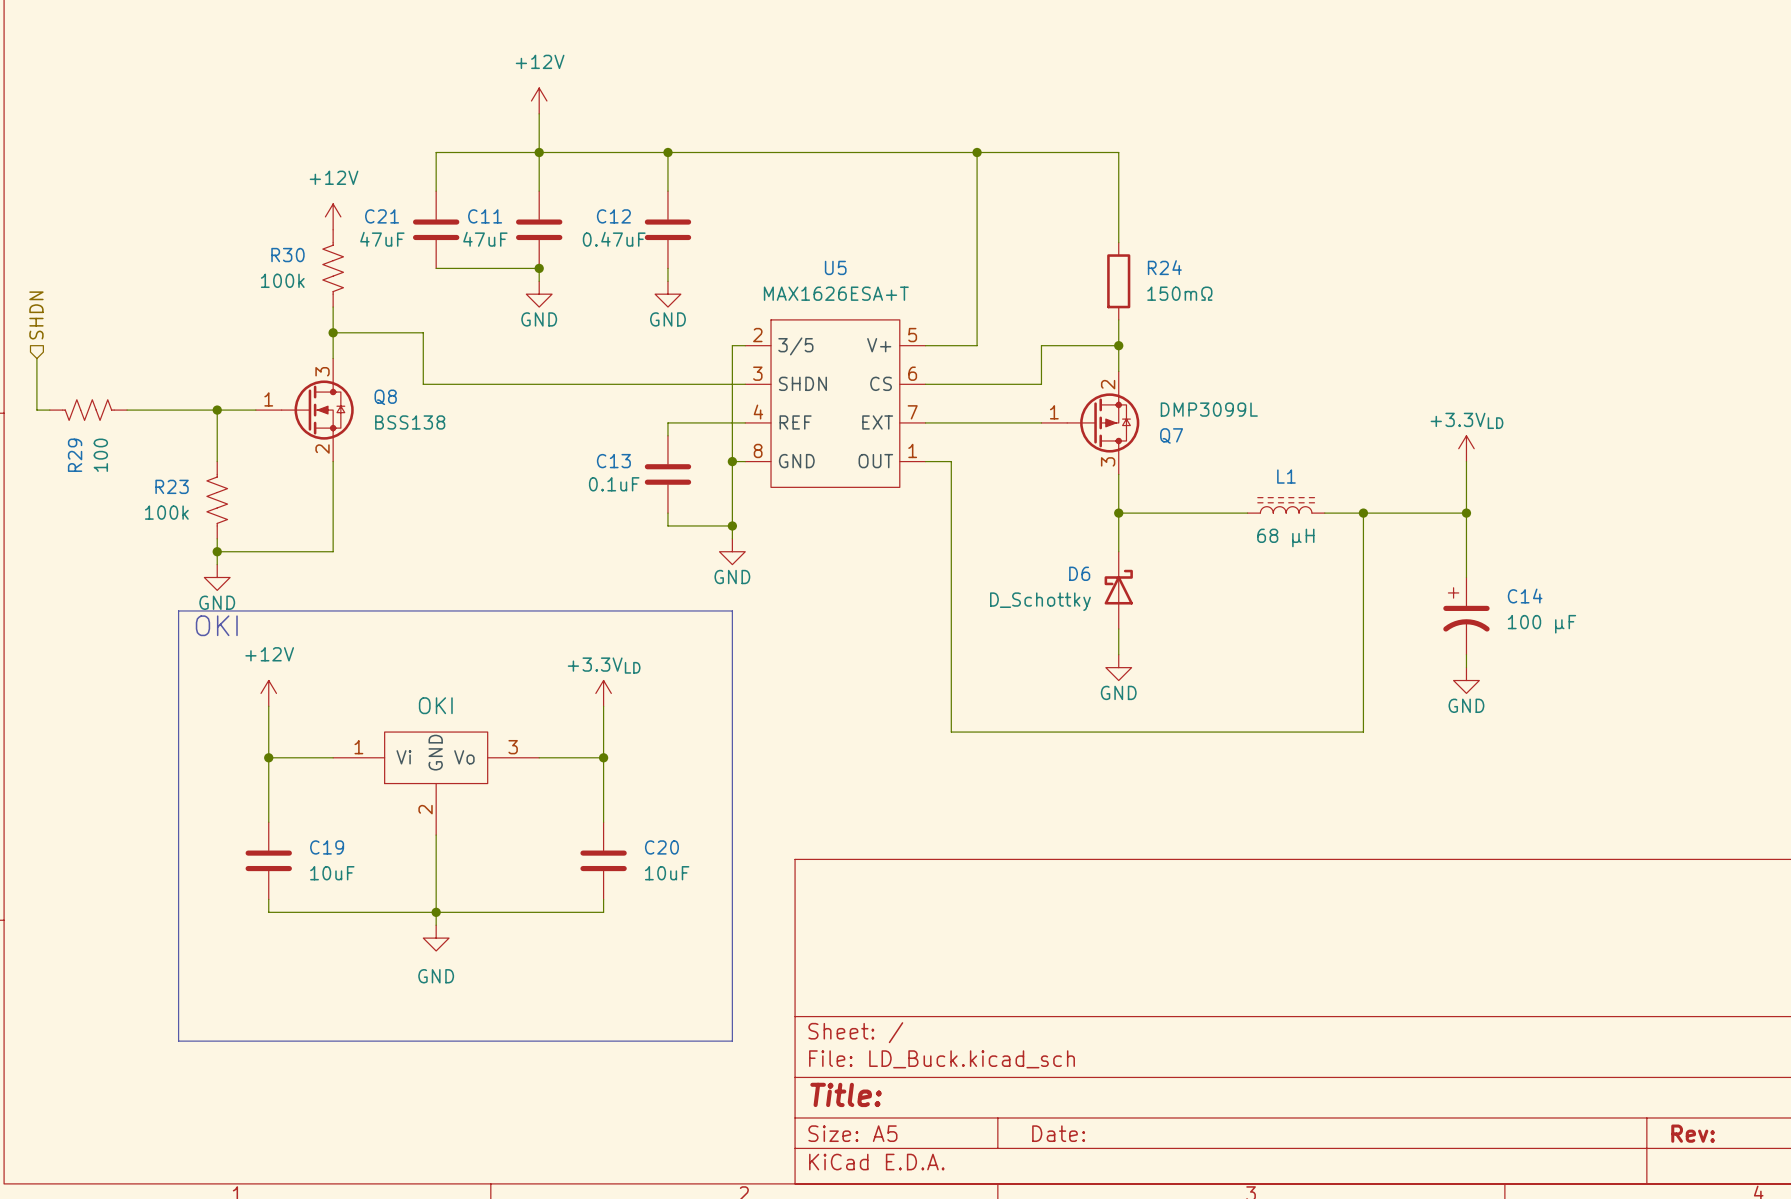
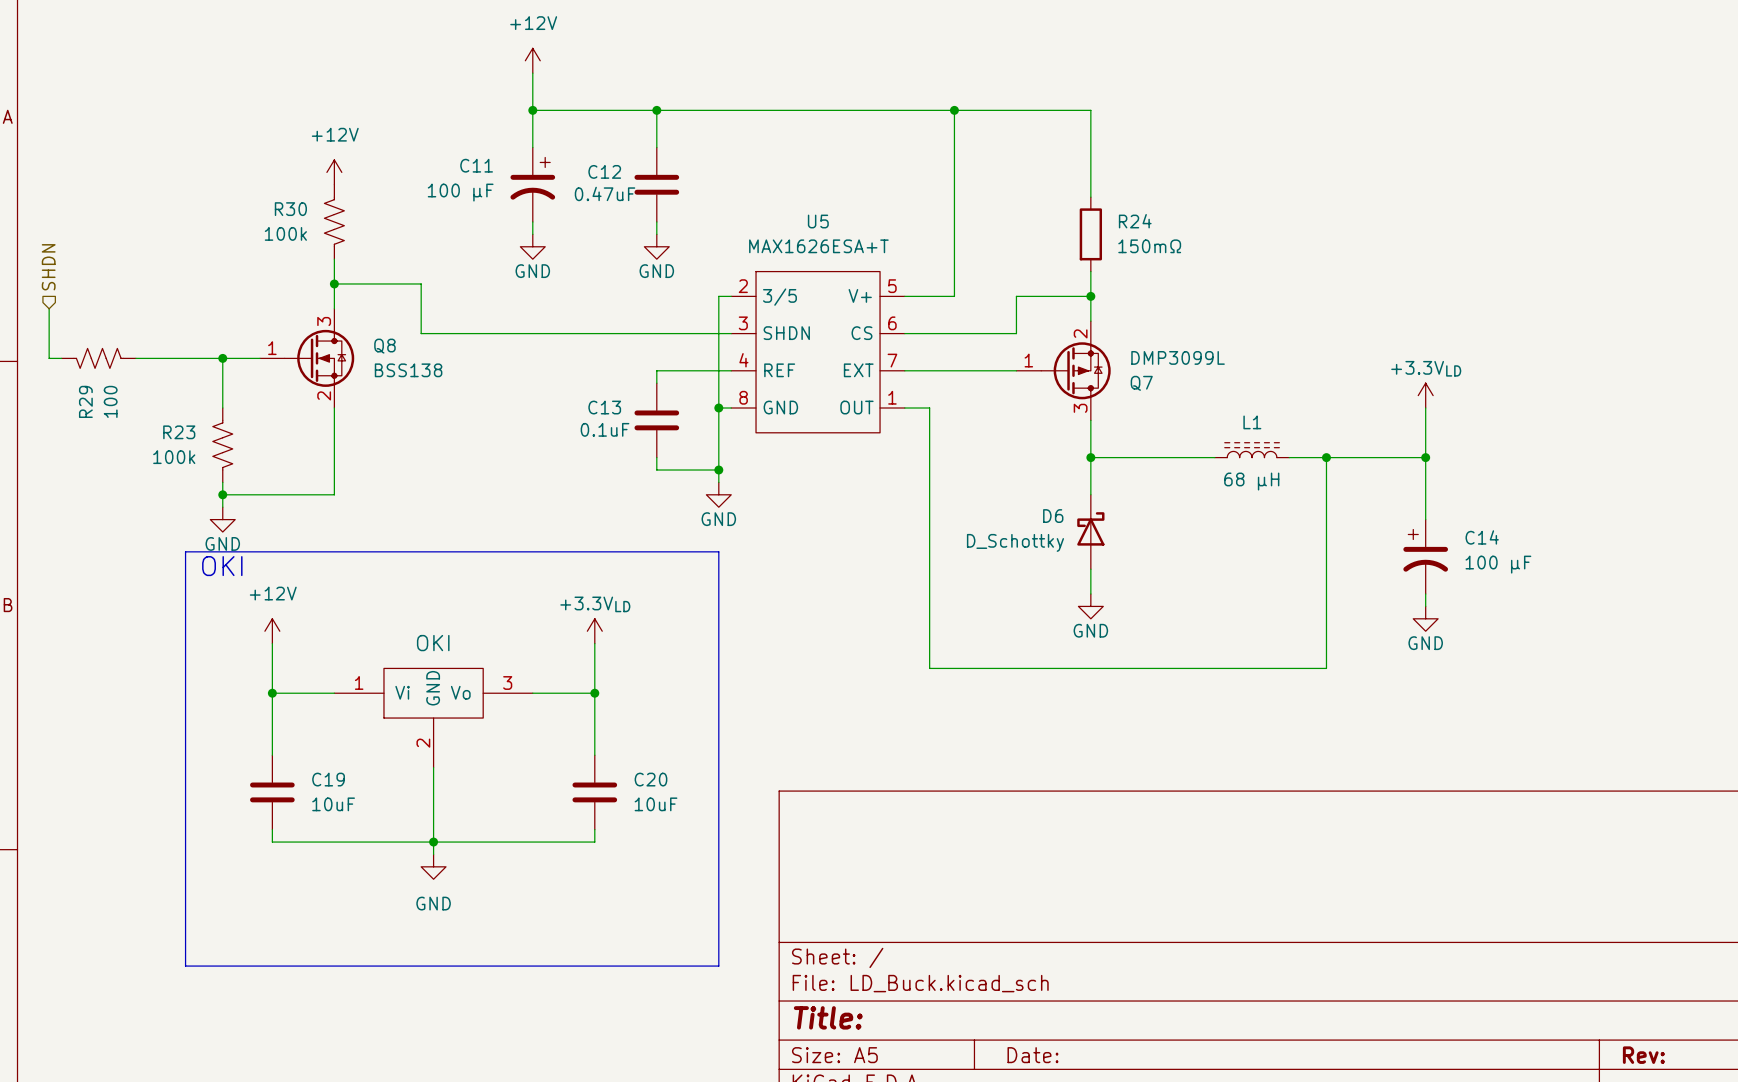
wire: (539, 152) (436, 152) (436, 191) -> none
C11 symbol: [516, 191, 563, 269] -> [510, 147, 556, 222]
C21: 47uF (436, 229) -> none
C11 value: 47uF (485, 239) -> 100 µF (460, 192)
wire: (436, 268) (539, 268) -> none
junction: (539, 268) -> none

